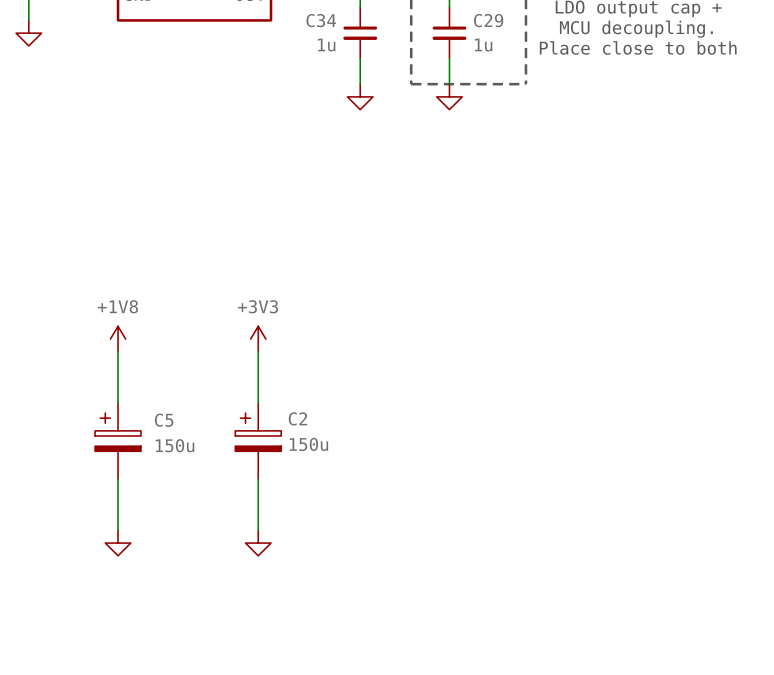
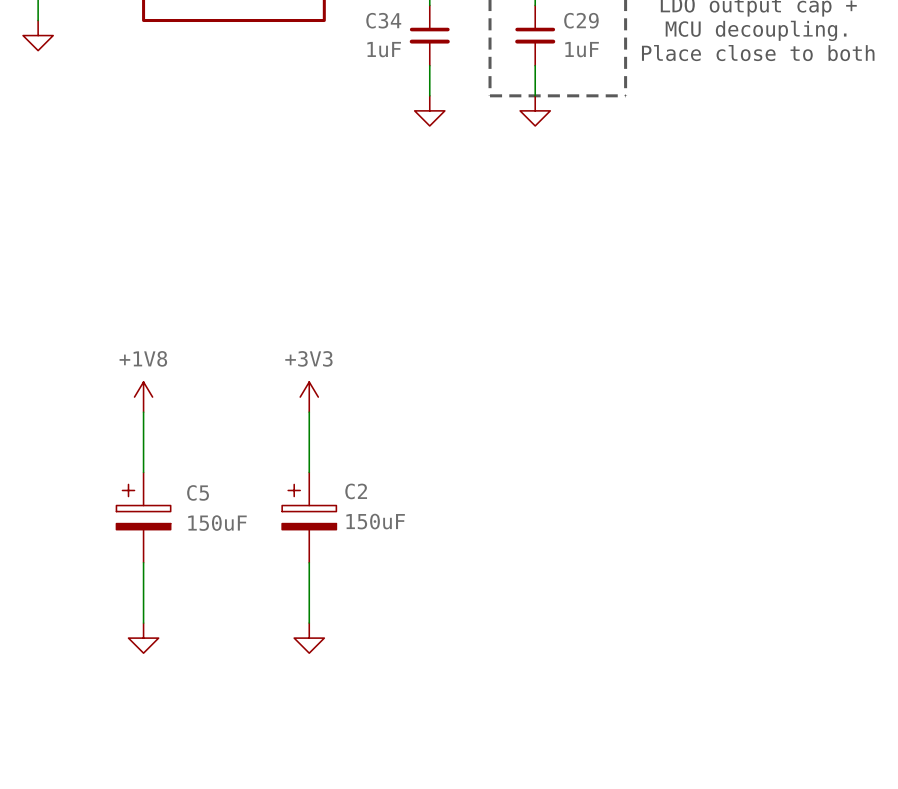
C34 value: 1u (326, 45) -> 1uF (384, 49)
C29 value: 1u (483, 45) -> 1uF (582, 49)
C2 value: 150u (308, 444) -> 150uF (375, 521)
C5 value: 150u (175, 445) -> 150uF (217, 523)

